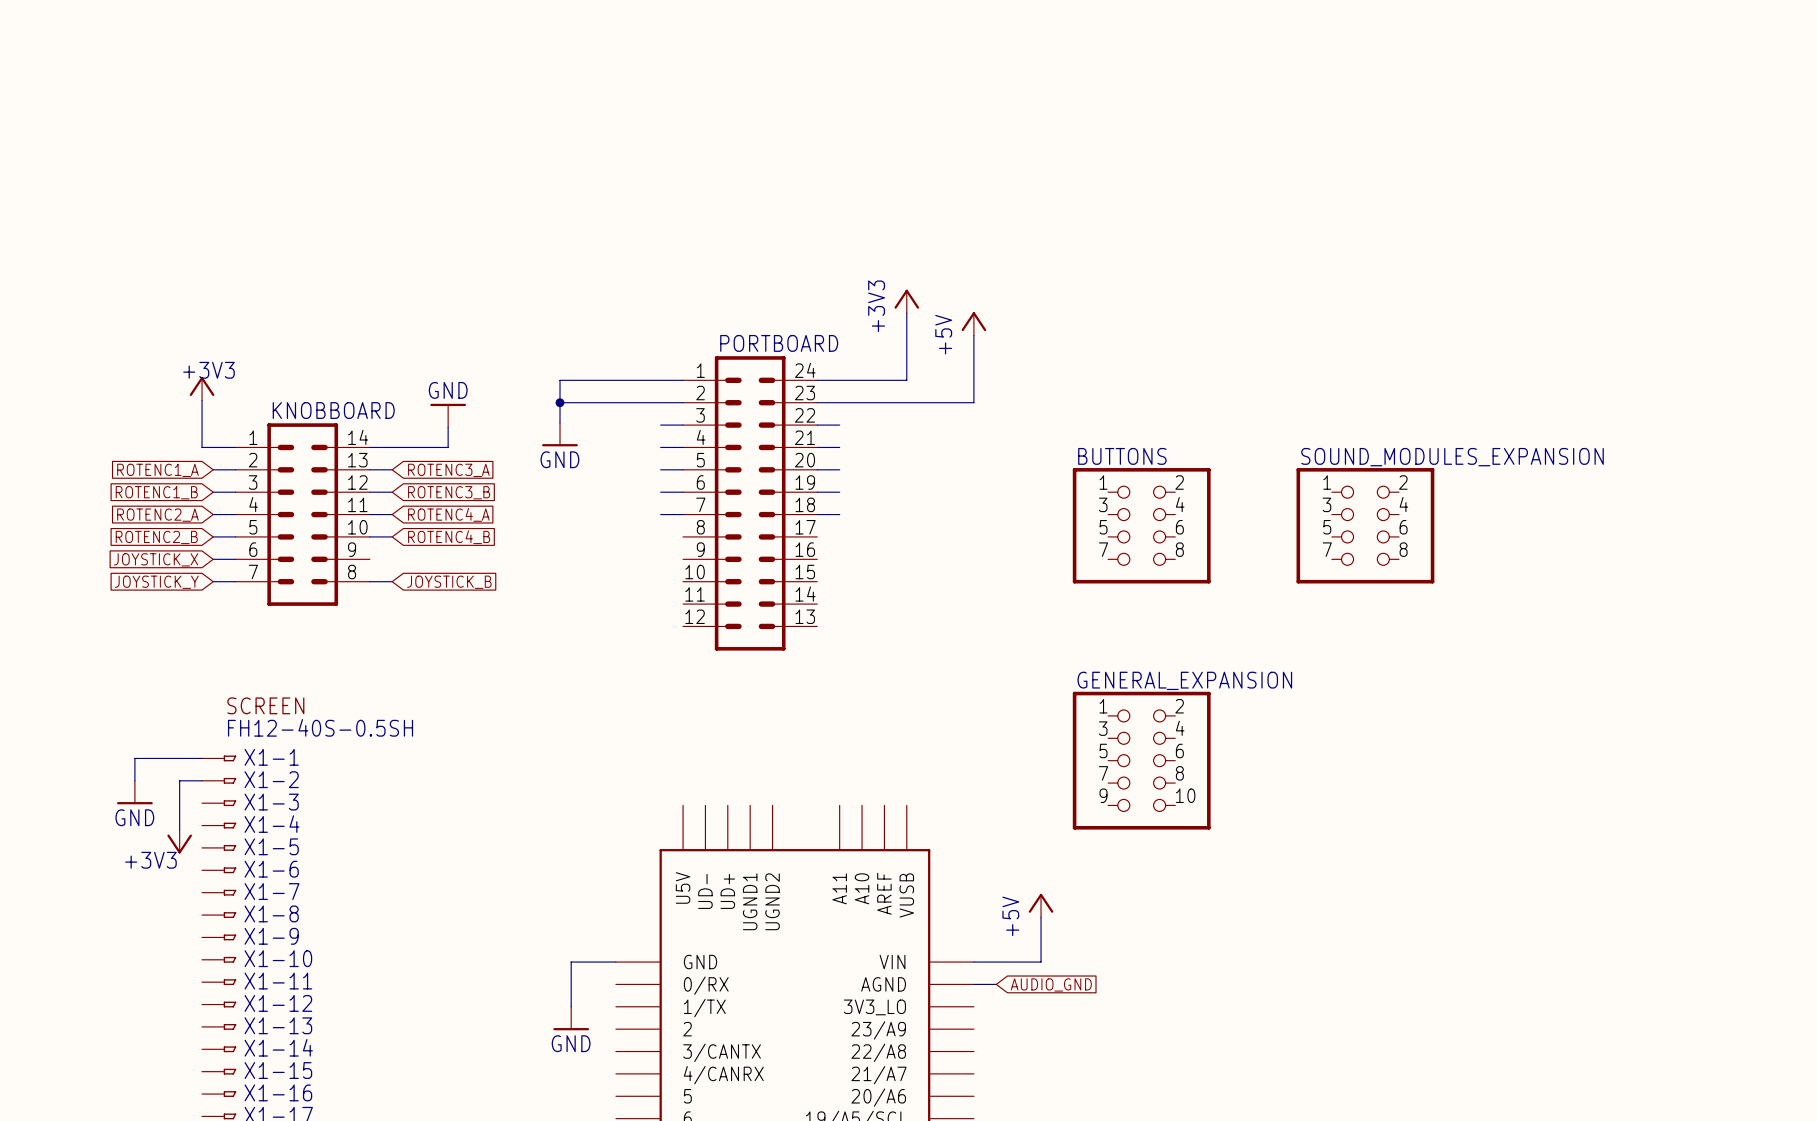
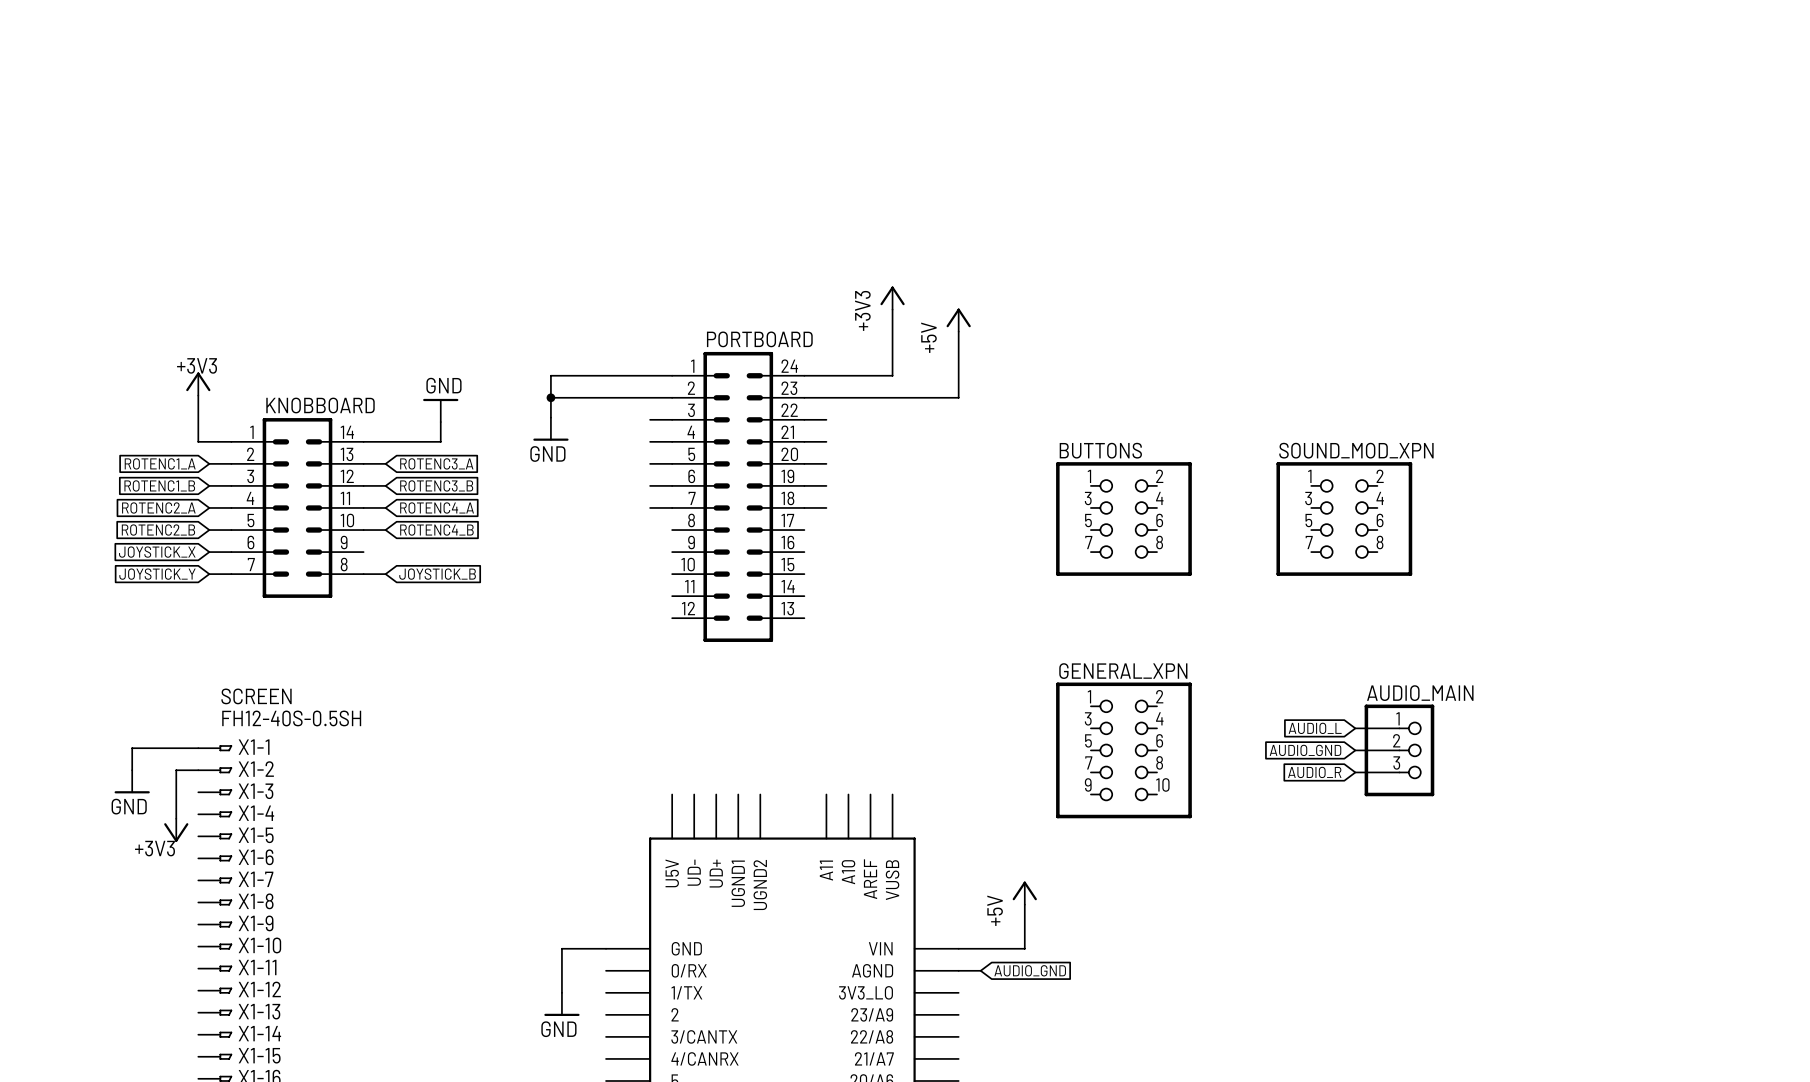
SOUND_MODULES_EXPANSION name: SOUND_MODULES_EXPANSION (1452, 457) -> SOUND_MOD_XPN (1356, 450)
GENERAL_EXPANSION name: GENERAL_EXPANSION (1184, 680) -> GENERAL_XPN (1123, 671)
global label: none -> AUDIO_L (1315, 728)
wire: none -> (1355, 728) (1399, 728)
wire: none -> (1355, 750) (1399, 750)
AUDIO_MAIN: none -> (1399, 750)
global label: none -> AUDIO_GND (1305, 750)
global label: none -> AUDIO_R (1314, 772)
wire: none -> (1355, 772) (1399, 772)

